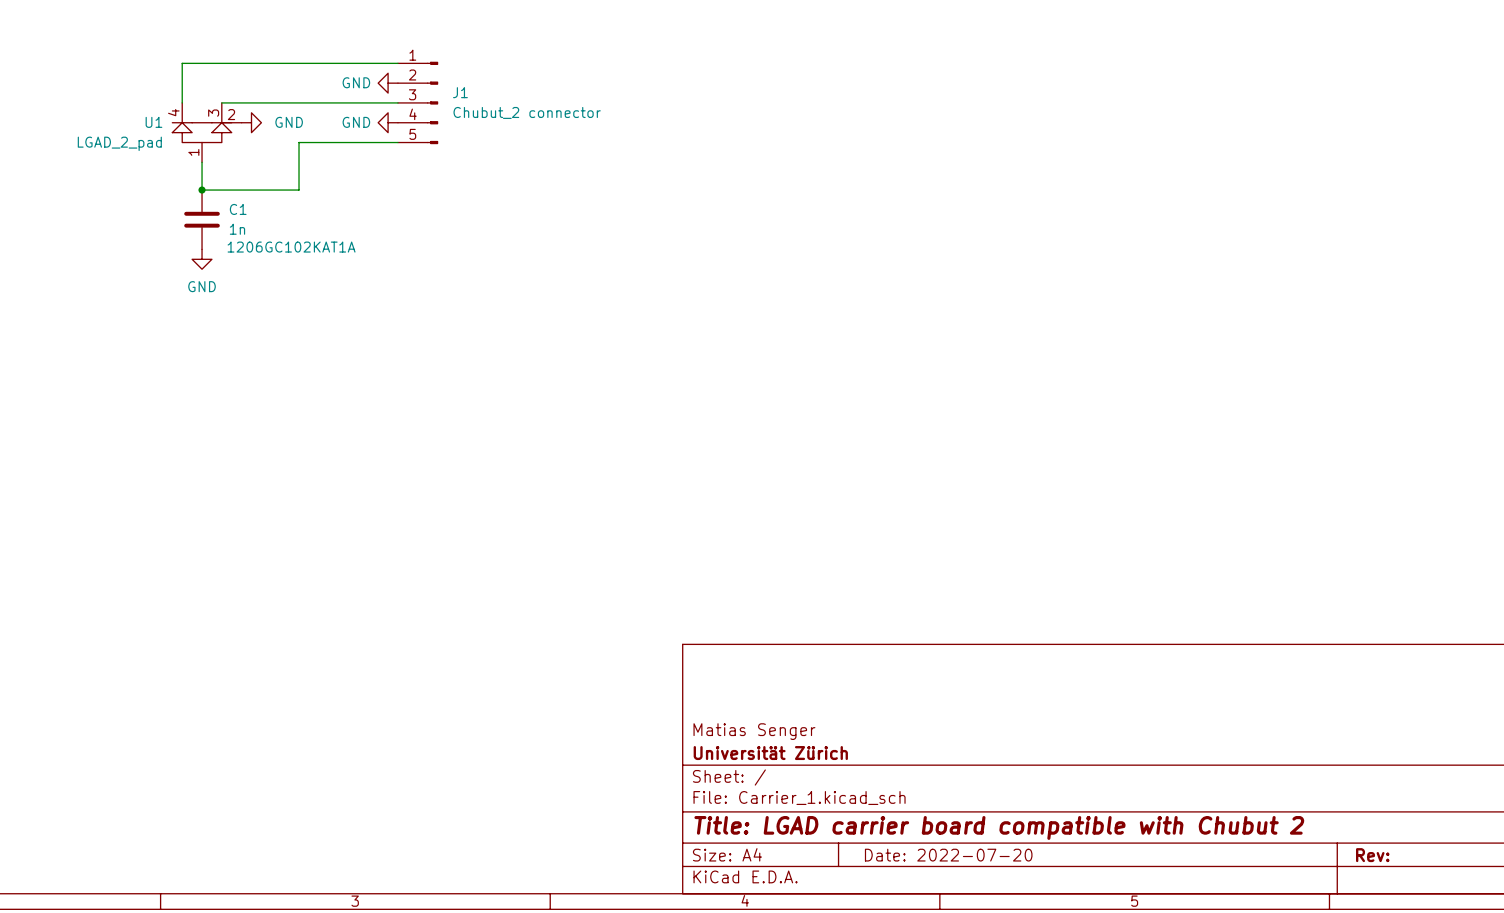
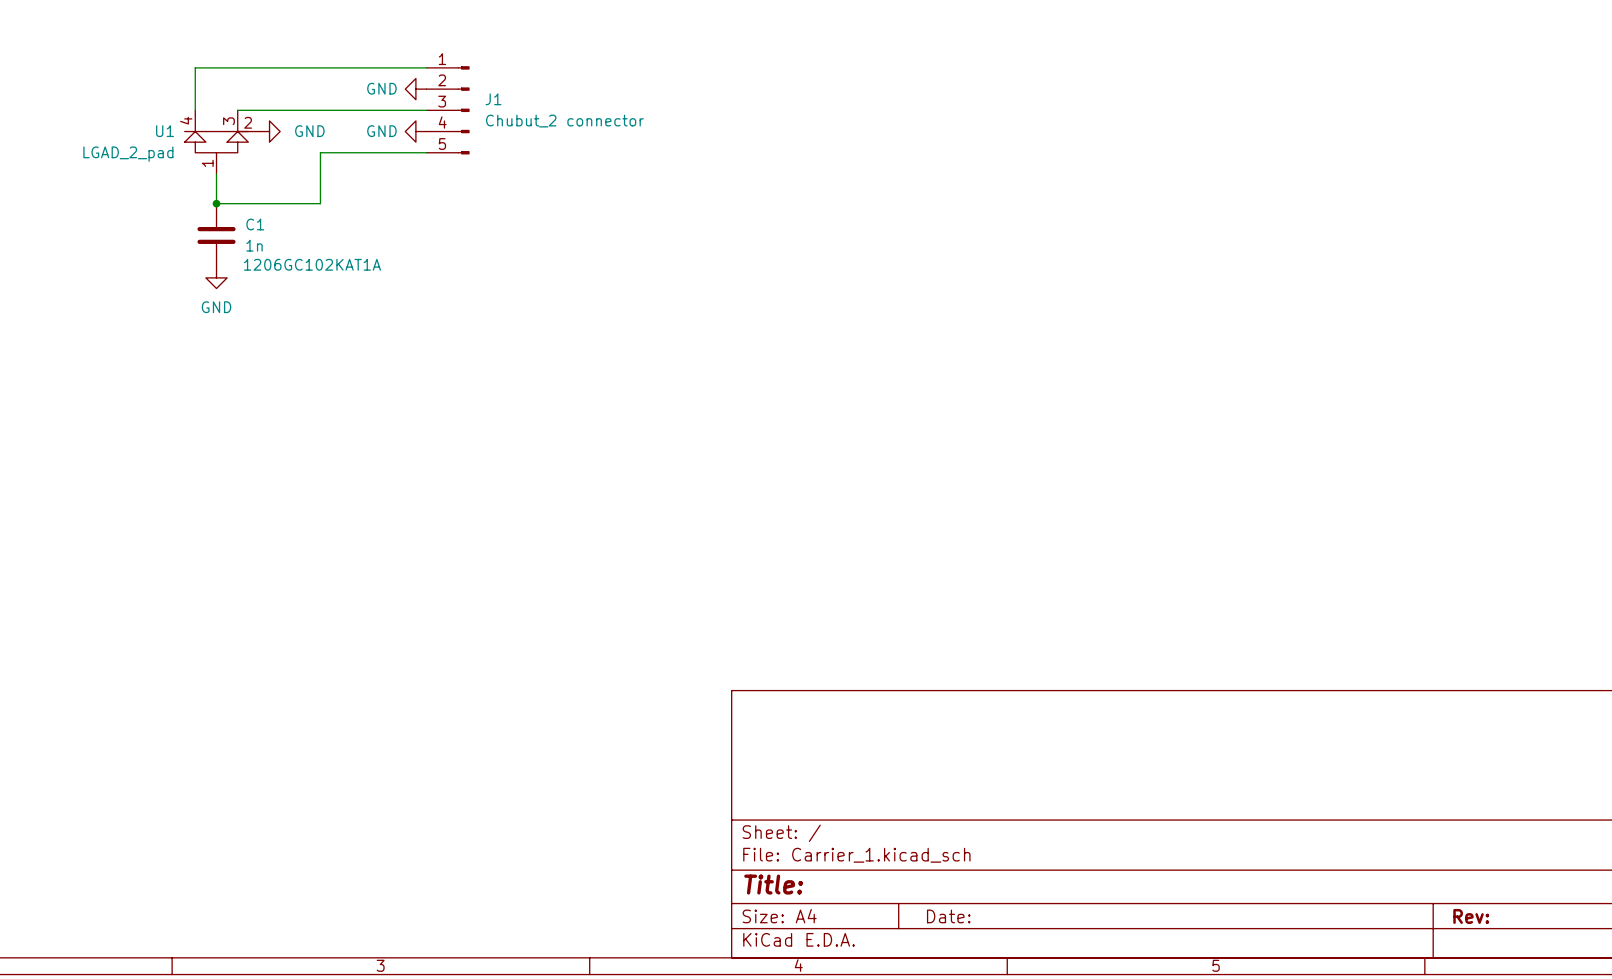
title block: Matias Senger (754, 731) -> none
title block: Universität Zürich (770, 753) -> none
title block: Title: LGAD carrier board compatible with Chubut 2 (999, 827) -> Title: (773, 884)
title block: Date: 2022-07-20 (948, 855) -> Date: (948, 916)

